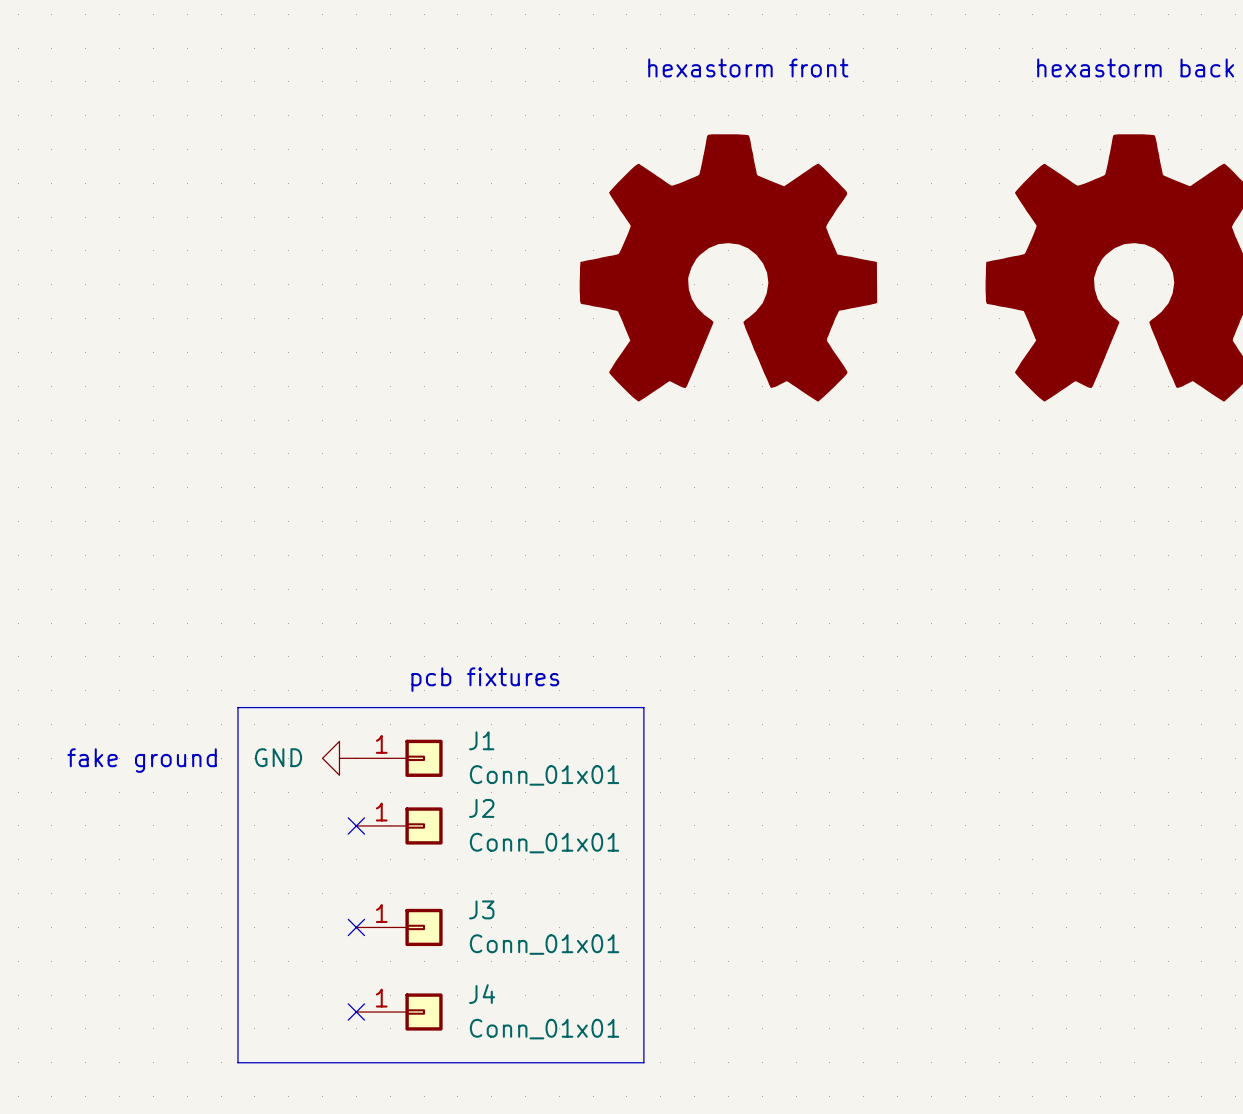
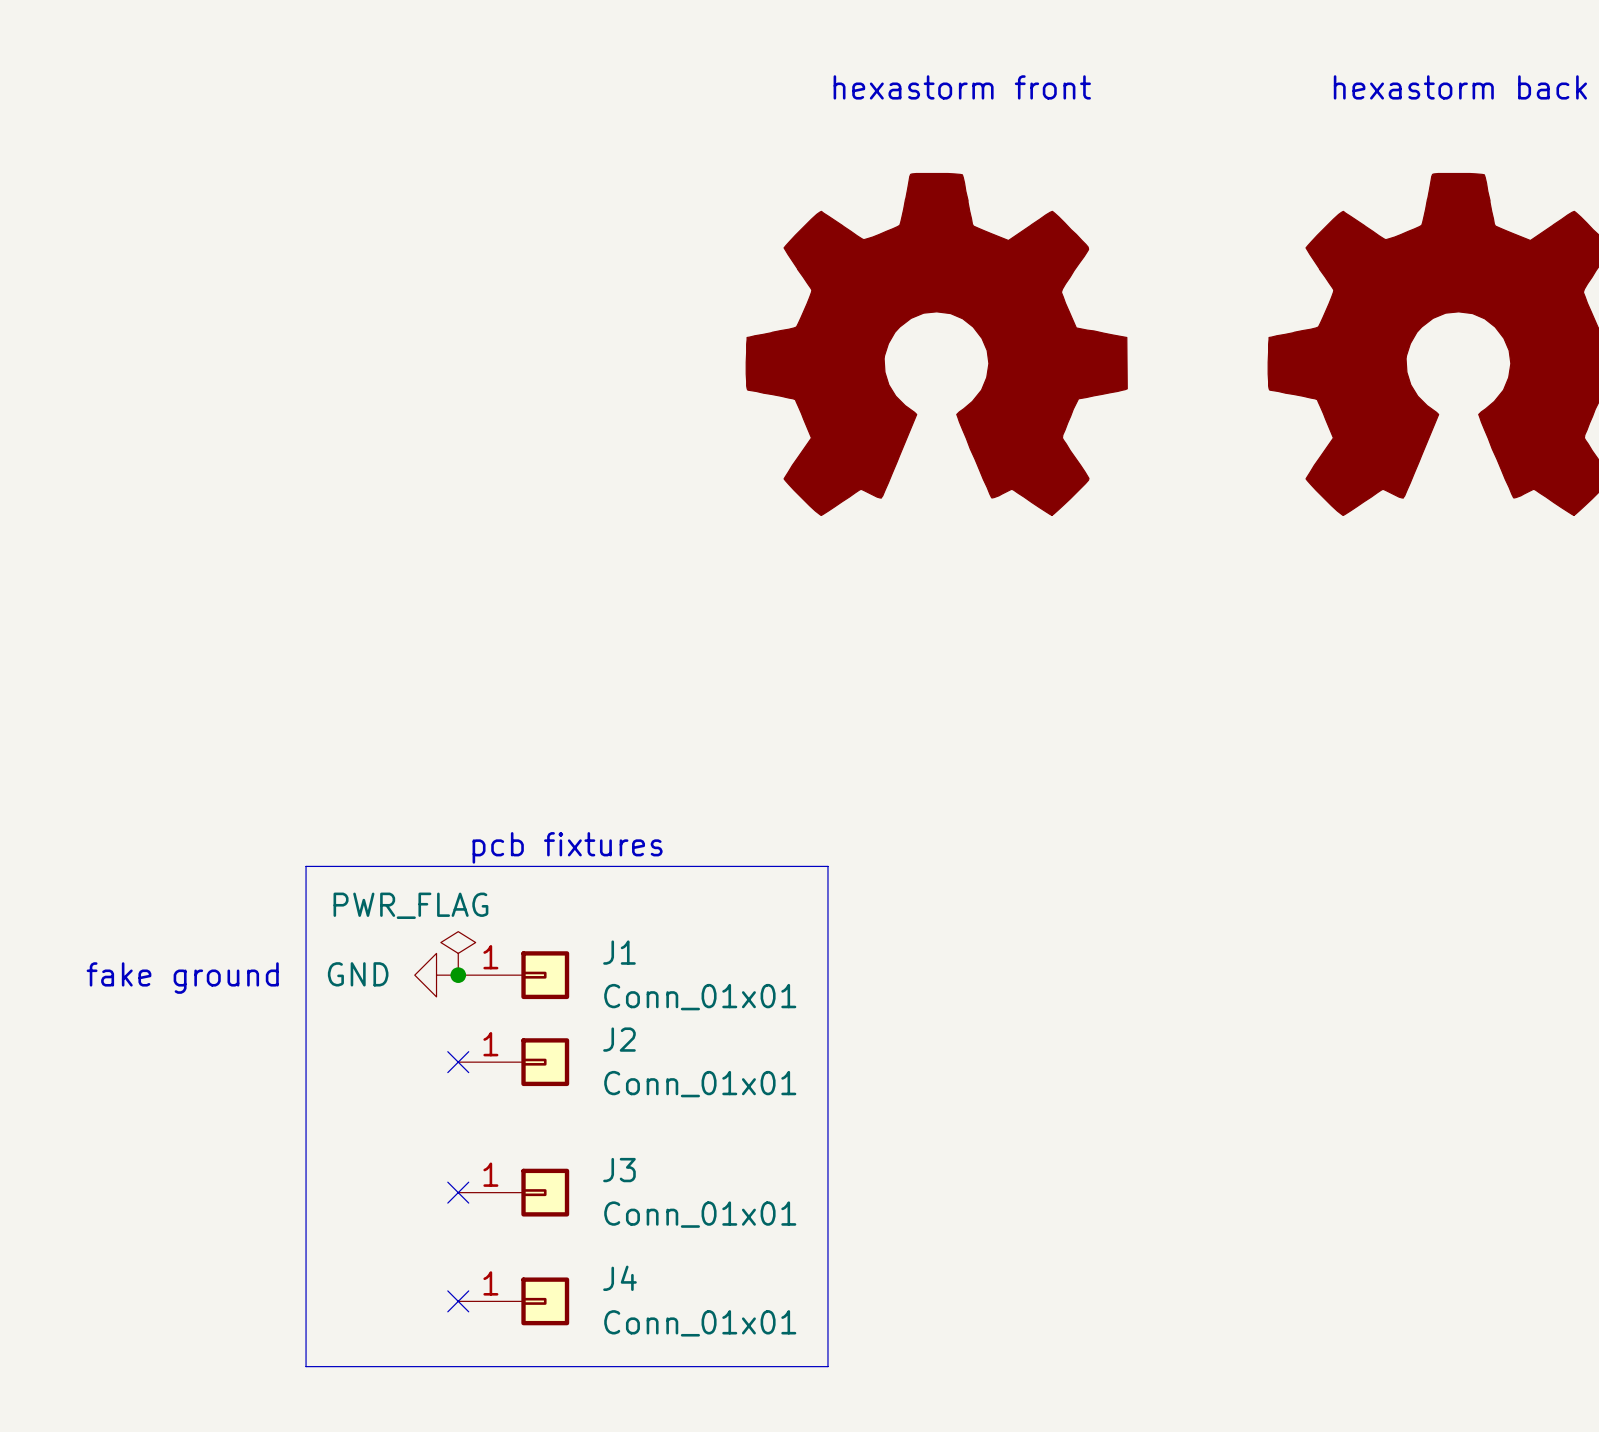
text position: pcb fixtures (485, 679) -> pcb fixtures (567, 847)
line: (237, 707) (643, 707) -> (306, 909) (306, 866) (827, 866) (827, 909)
power symbol: none -> PWR_FLAG (458, 953)
junction: none -> (458, 975)

